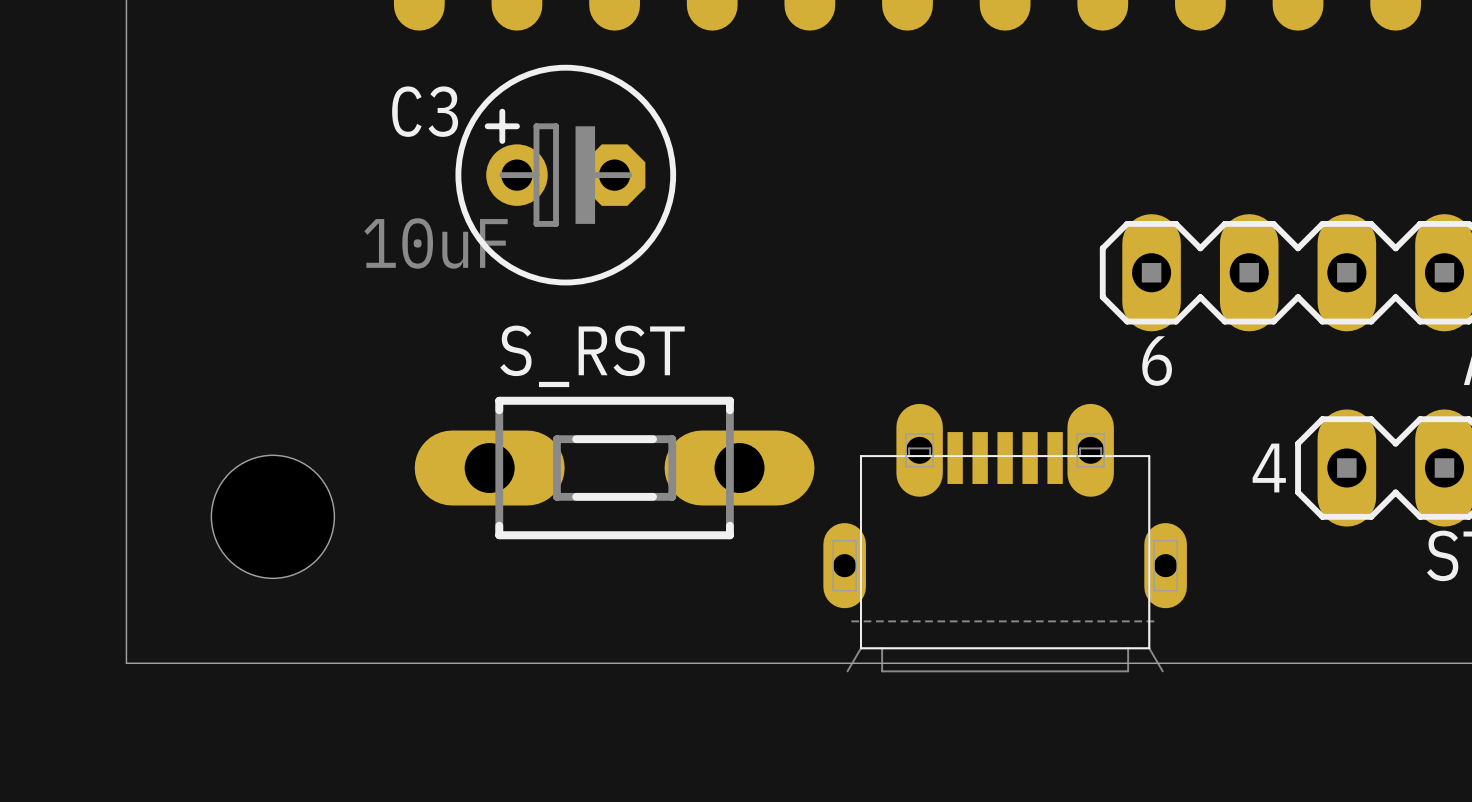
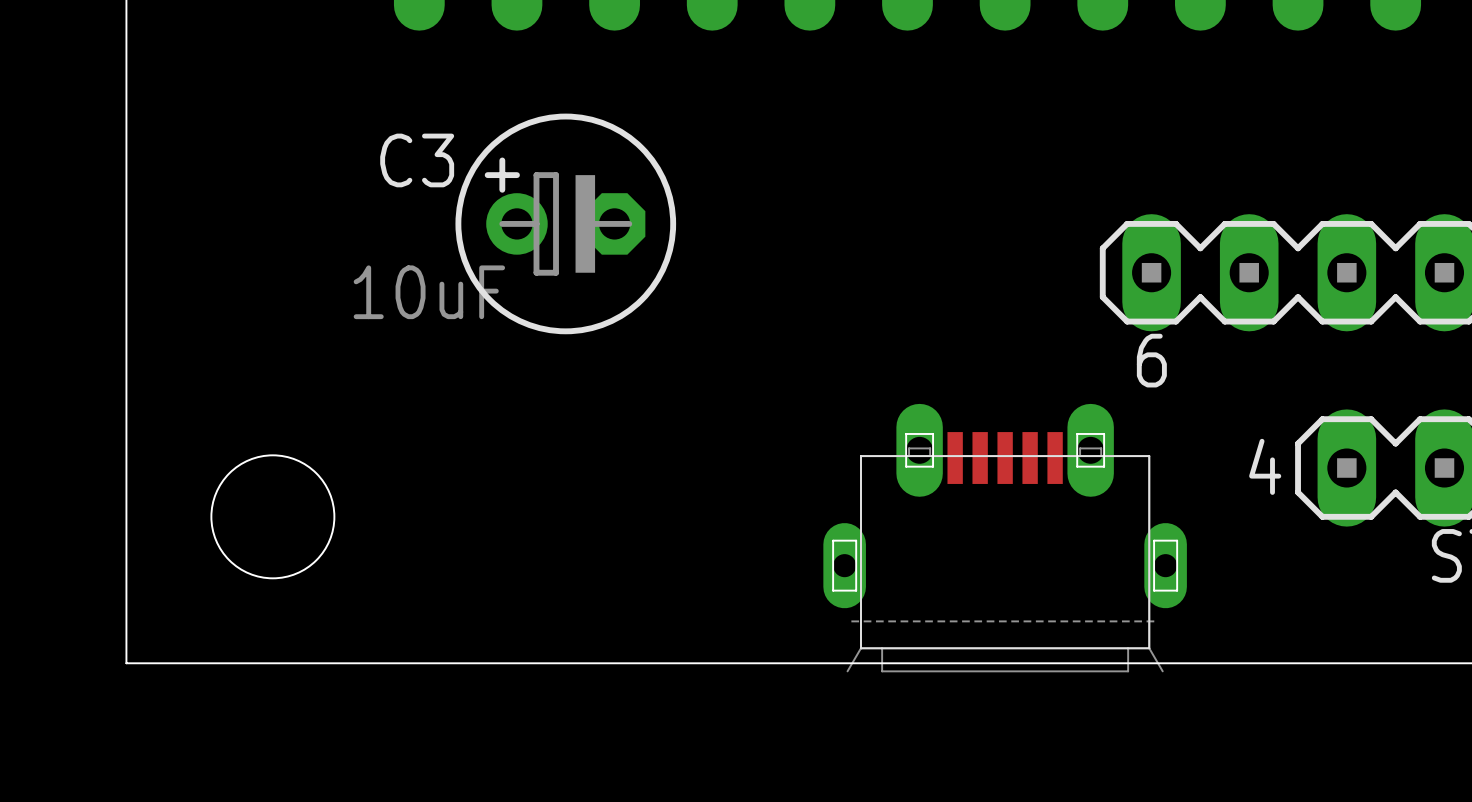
C3 position: (565, 175) -> (565, 223)
S_RST: (614, 468) -> none

